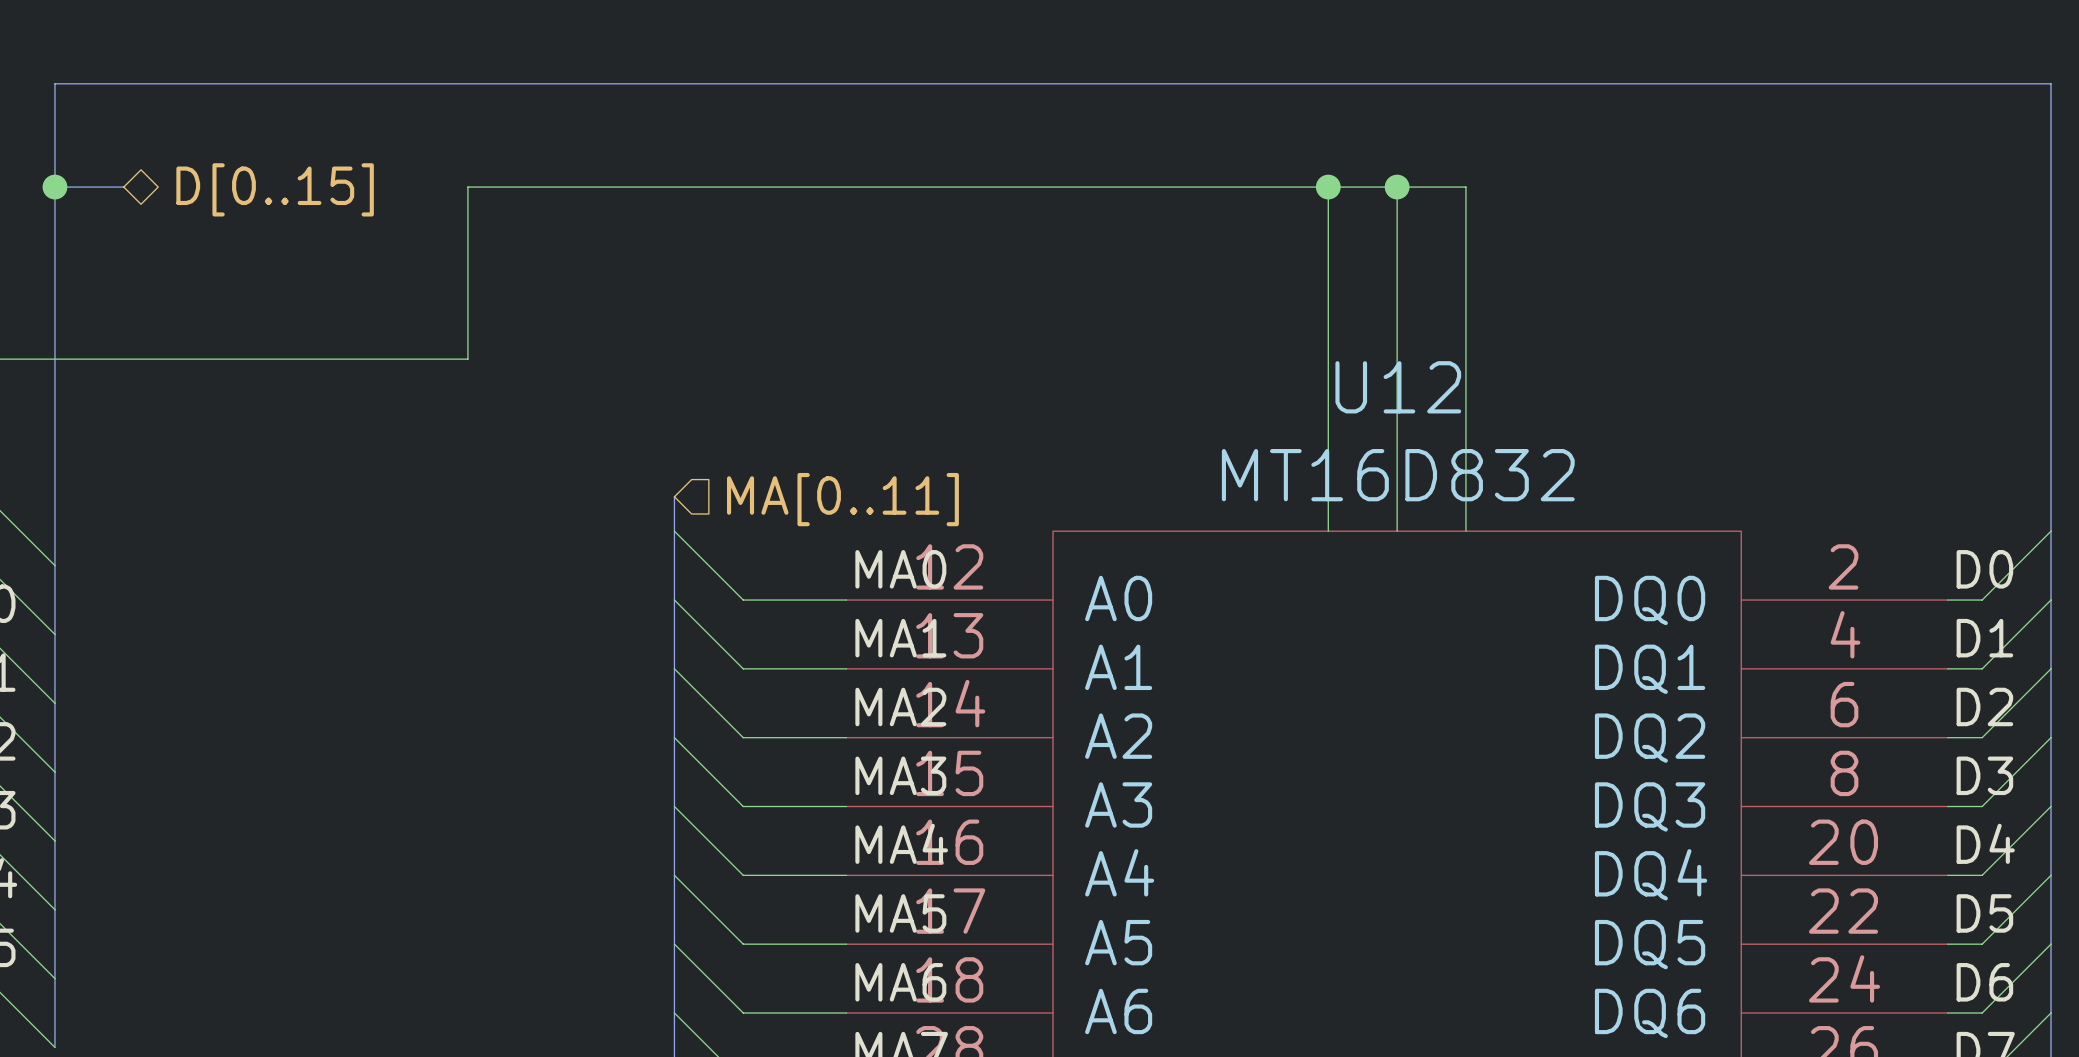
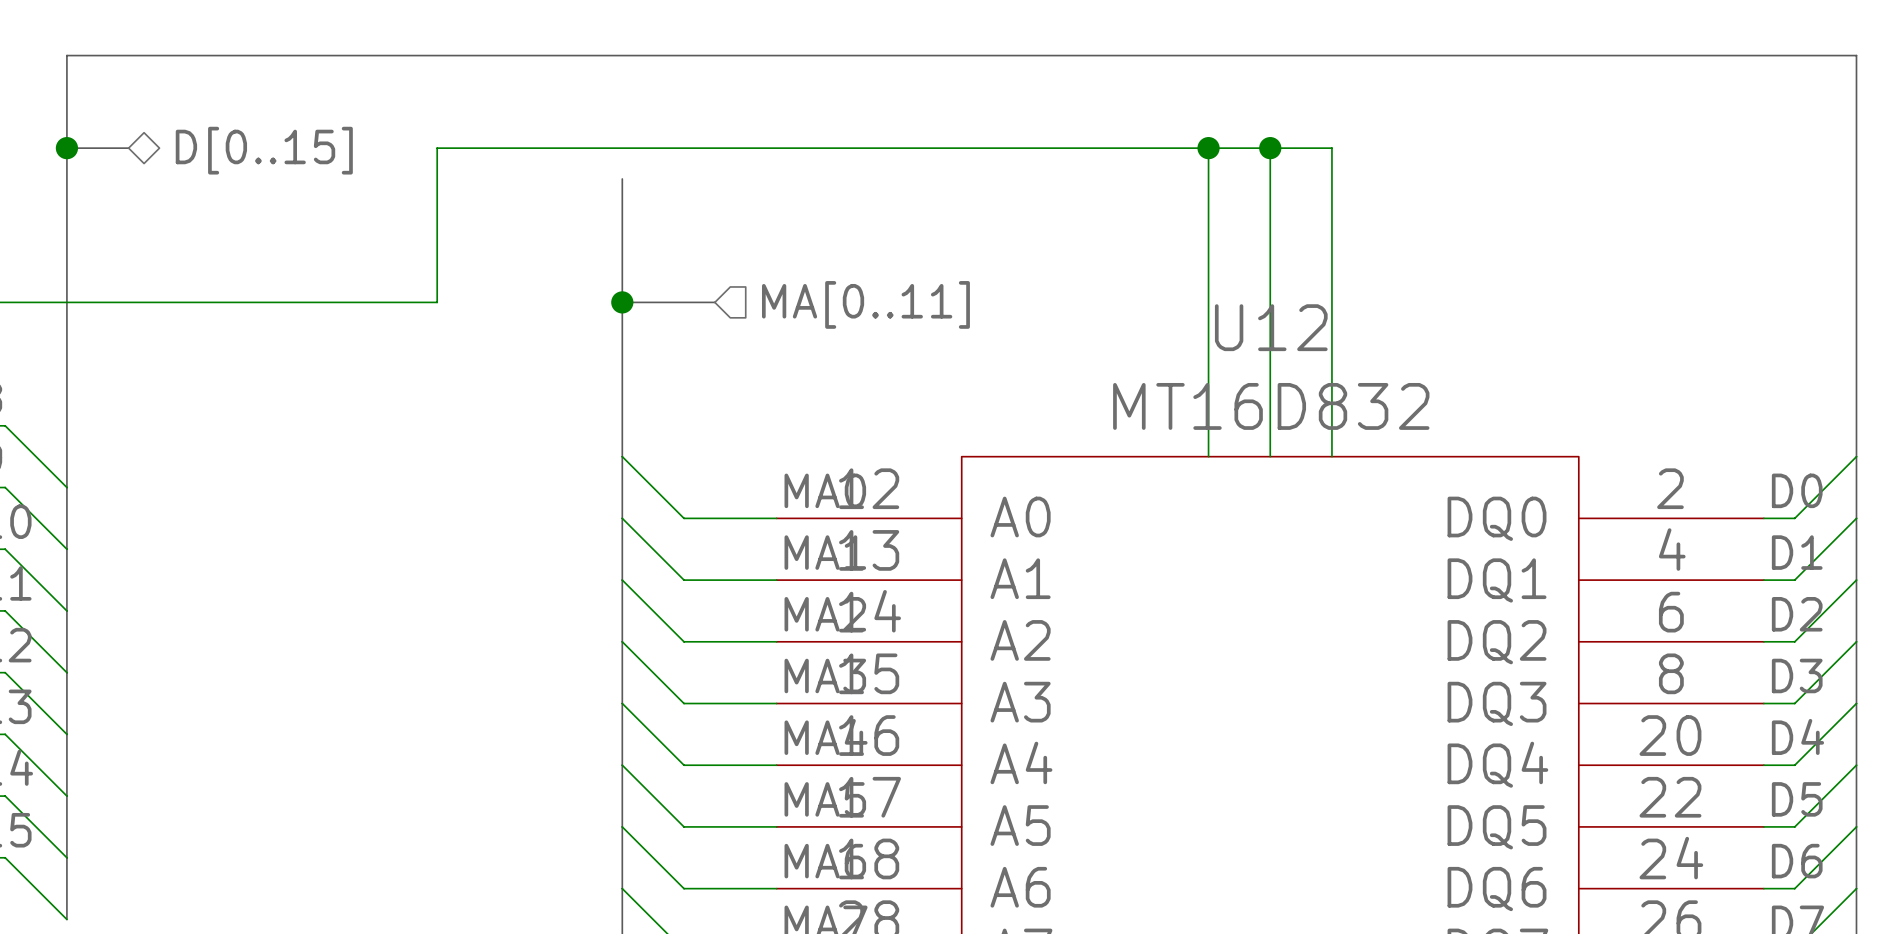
bus: none -> (622, 178) (622, 425)
bus: none -> (622, 302) (714, 302)
junction: none -> (622, 302)
hierarchical label position: MA[0..11] (842, 499) -> MA[0..11] (865, 304)

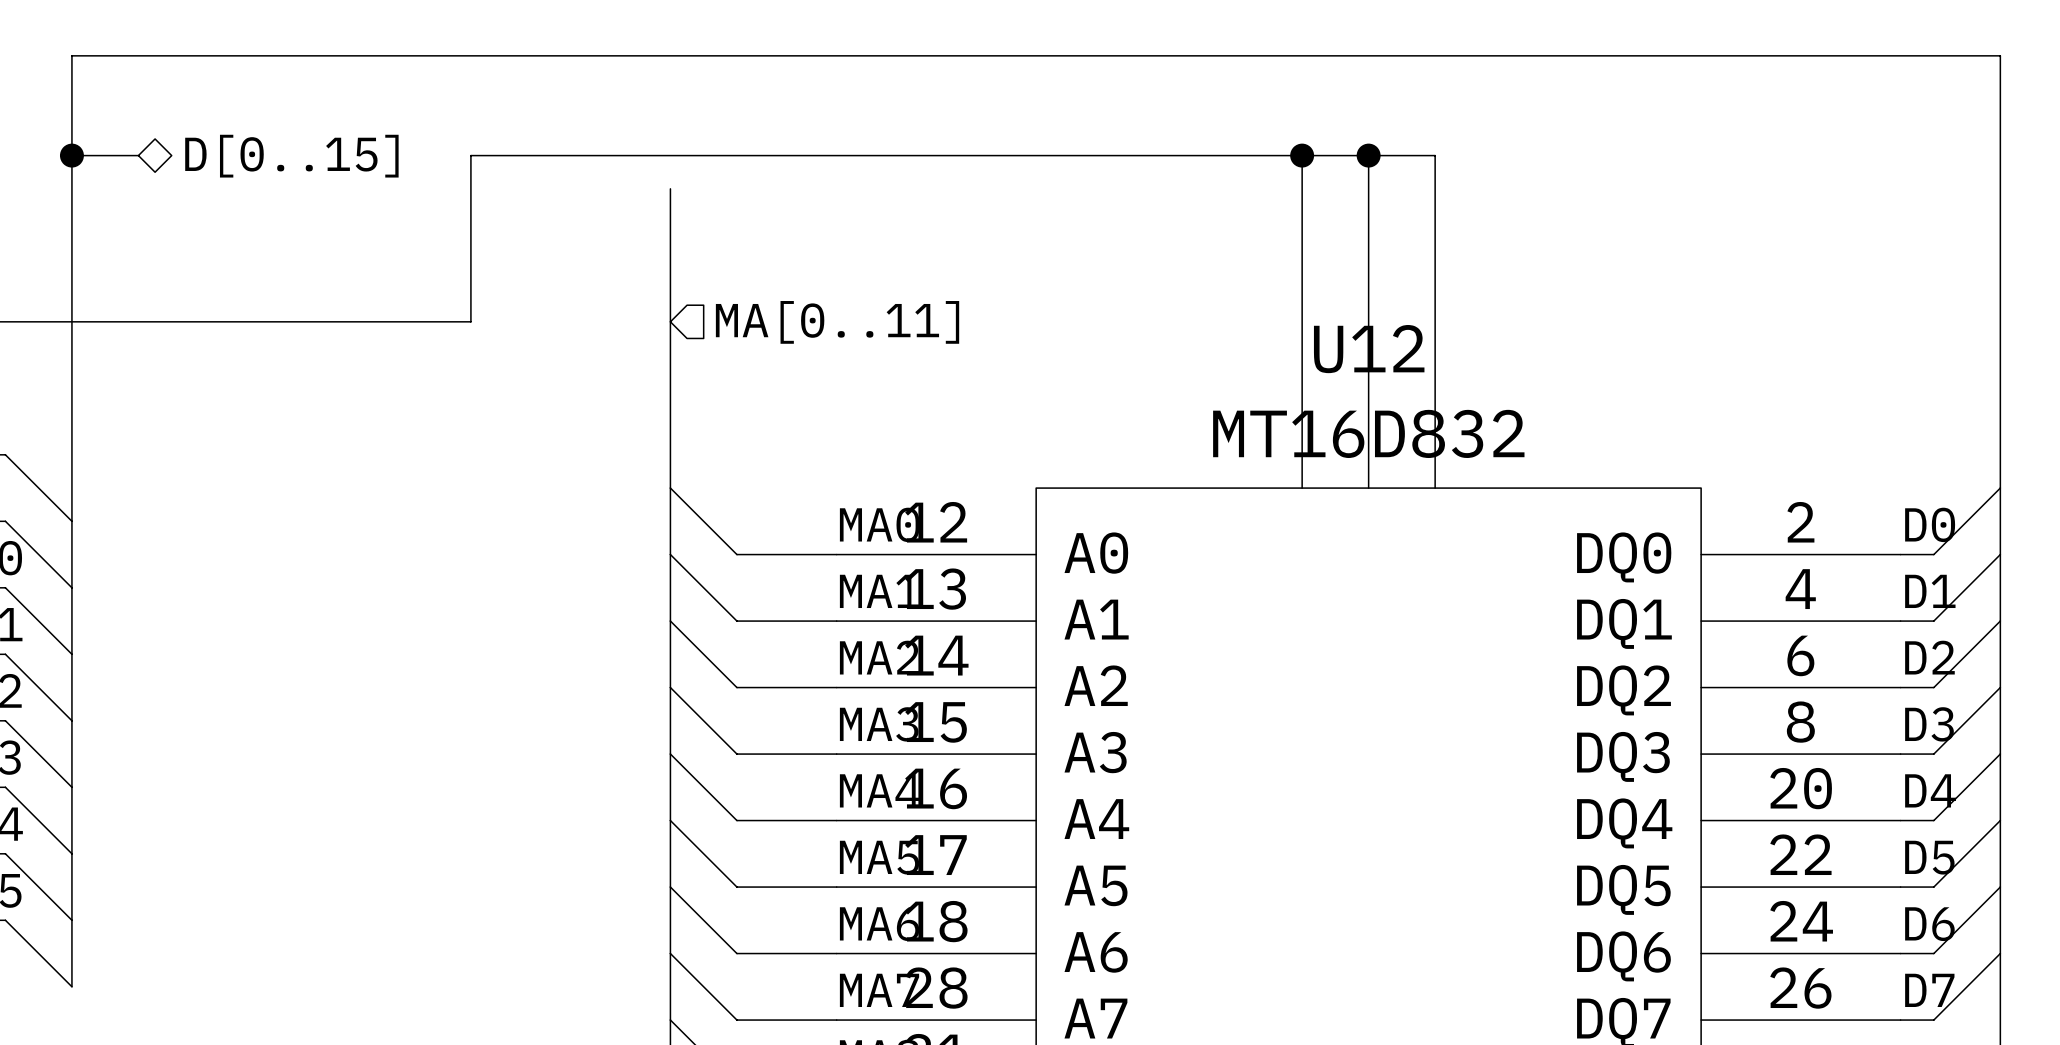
bus: (622, 302) (714, 302) -> none
junction: (622, 302) -> none
hierarchical label position: MA[0..11] (865, 304) -> MA[0..11] (837, 322)

